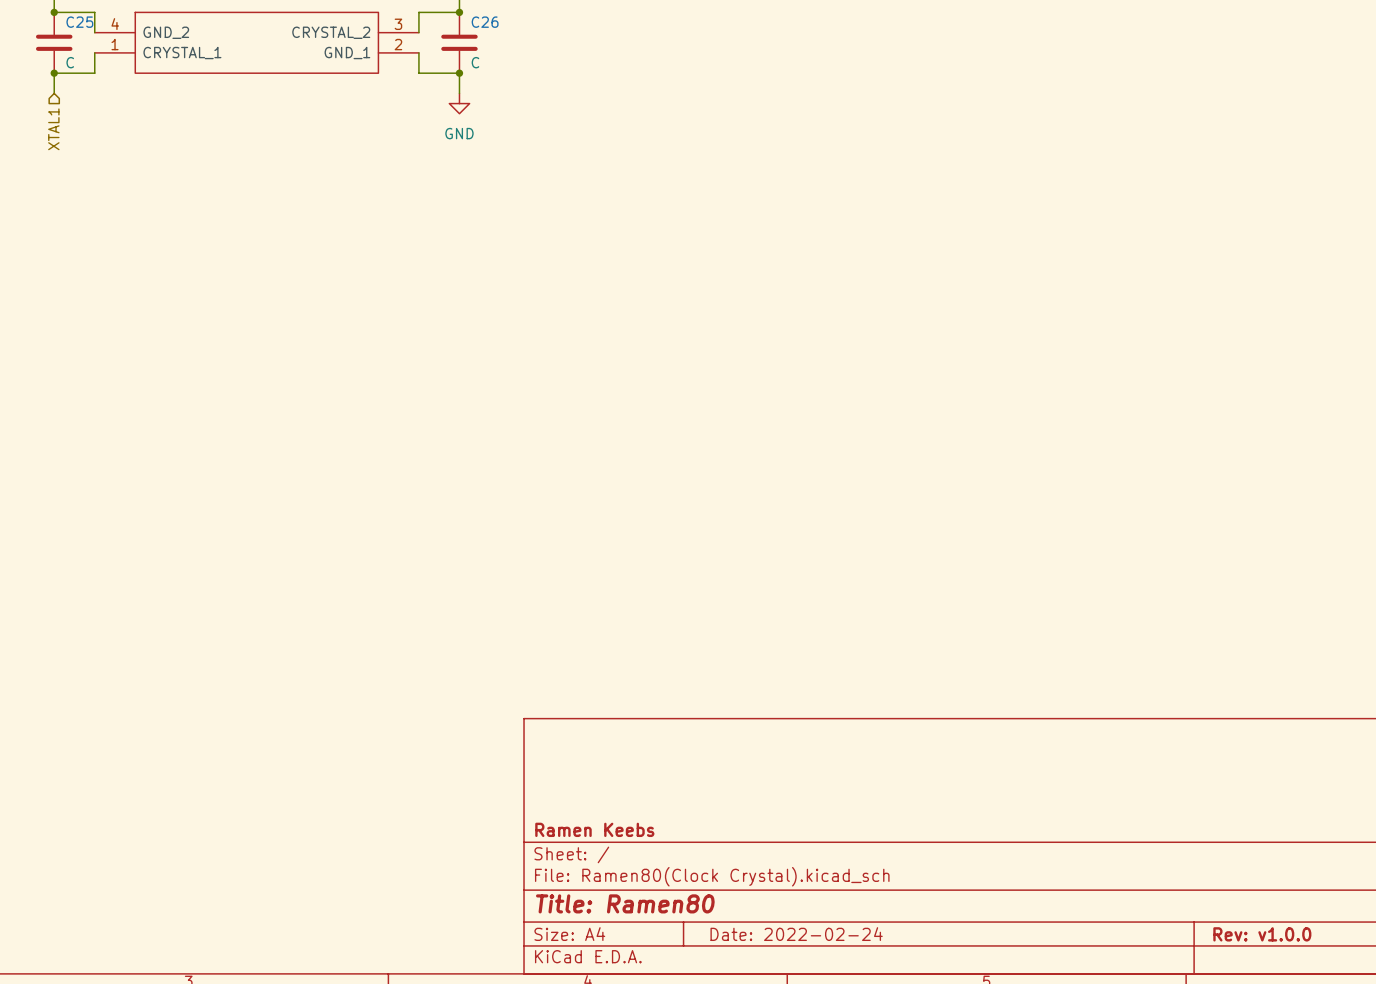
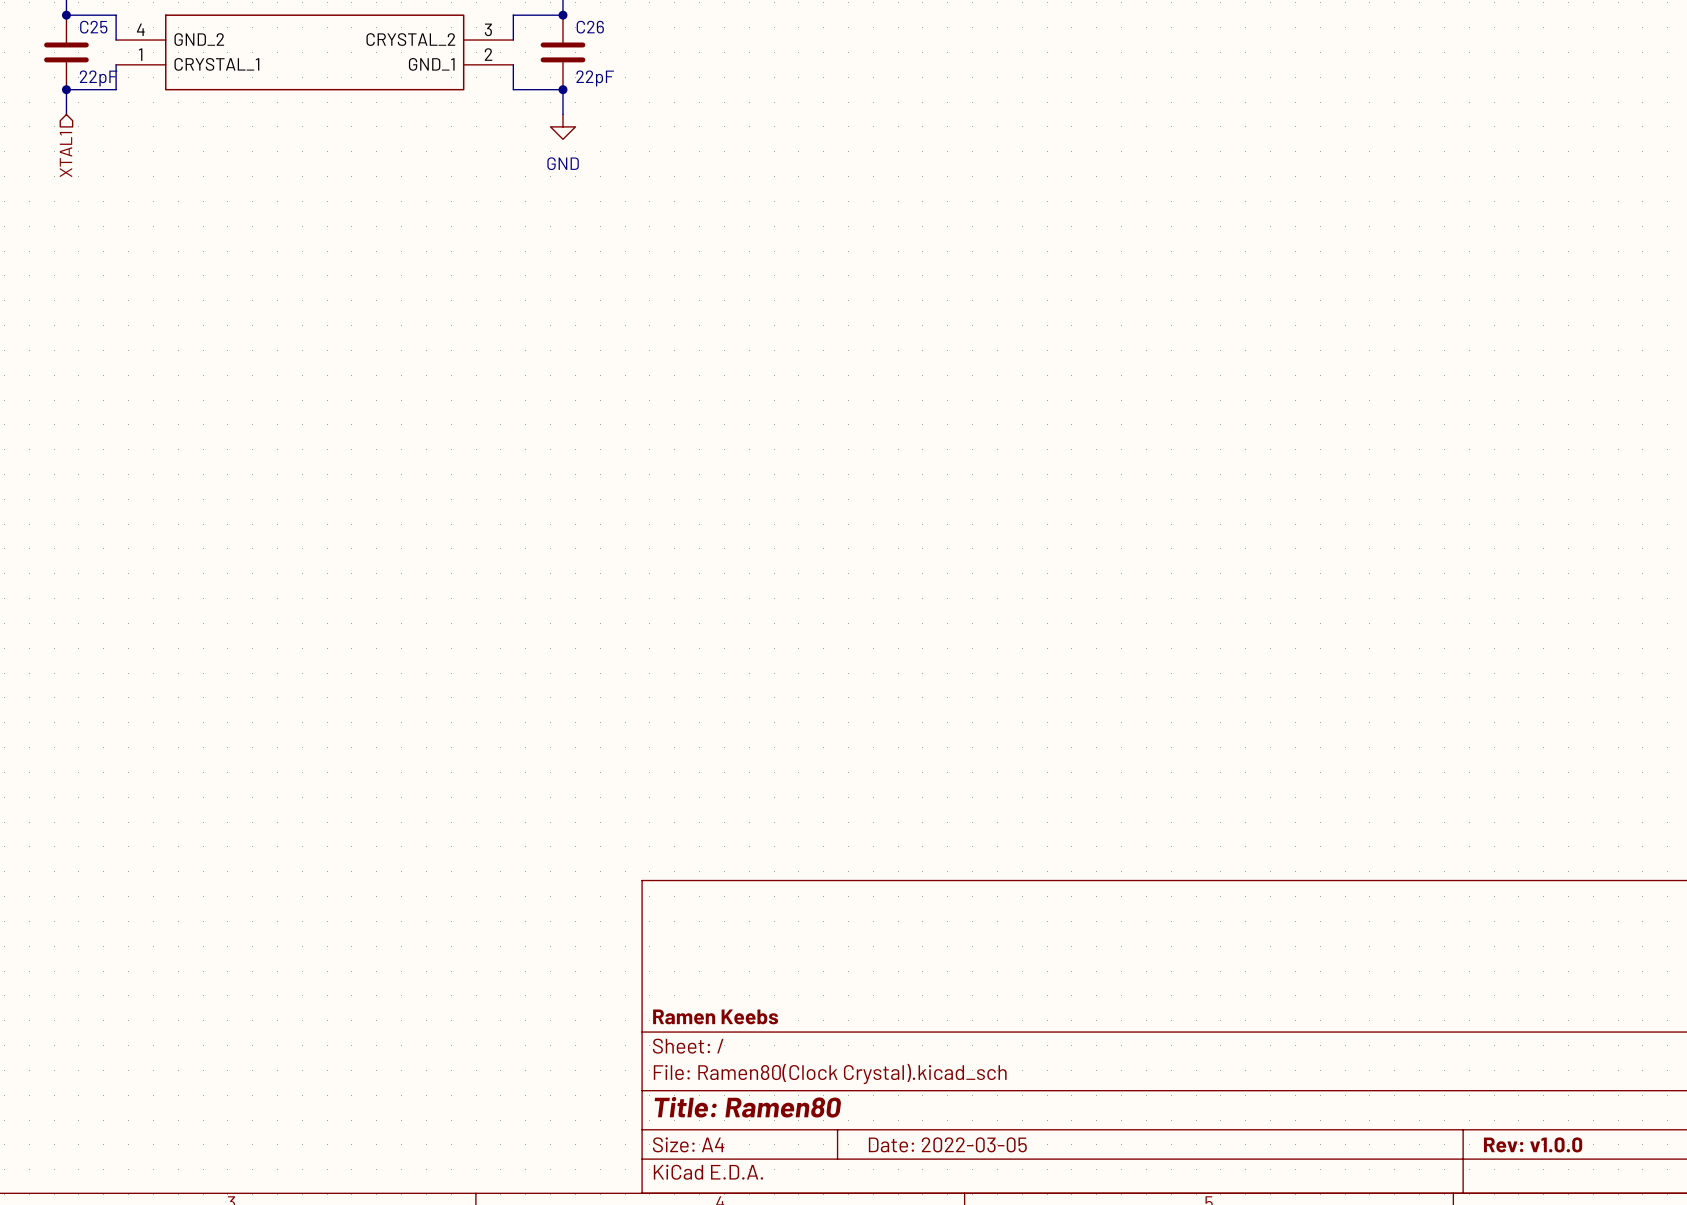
C25 value: C (70, 62) -> 22pF (98, 78)
C26 value: C (475, 62) -> 22pF (595, 78)
title block: Date: 2022-02-24 (796, 934) -> Date: 2022-03-05 (947, 1144)

